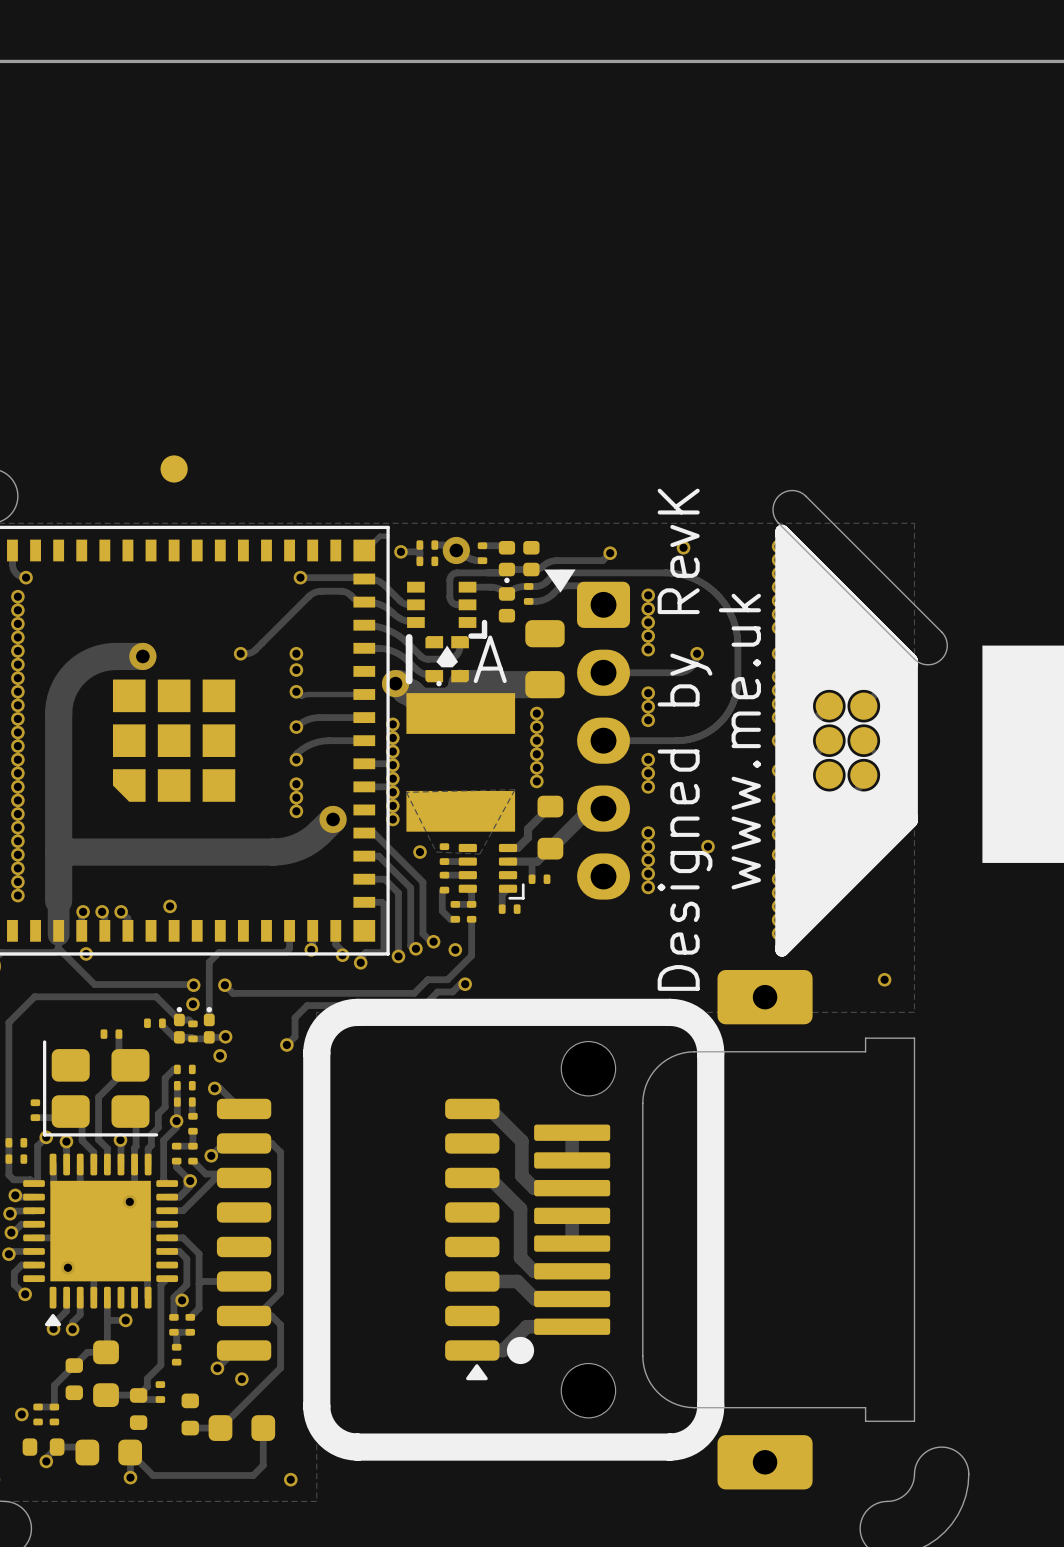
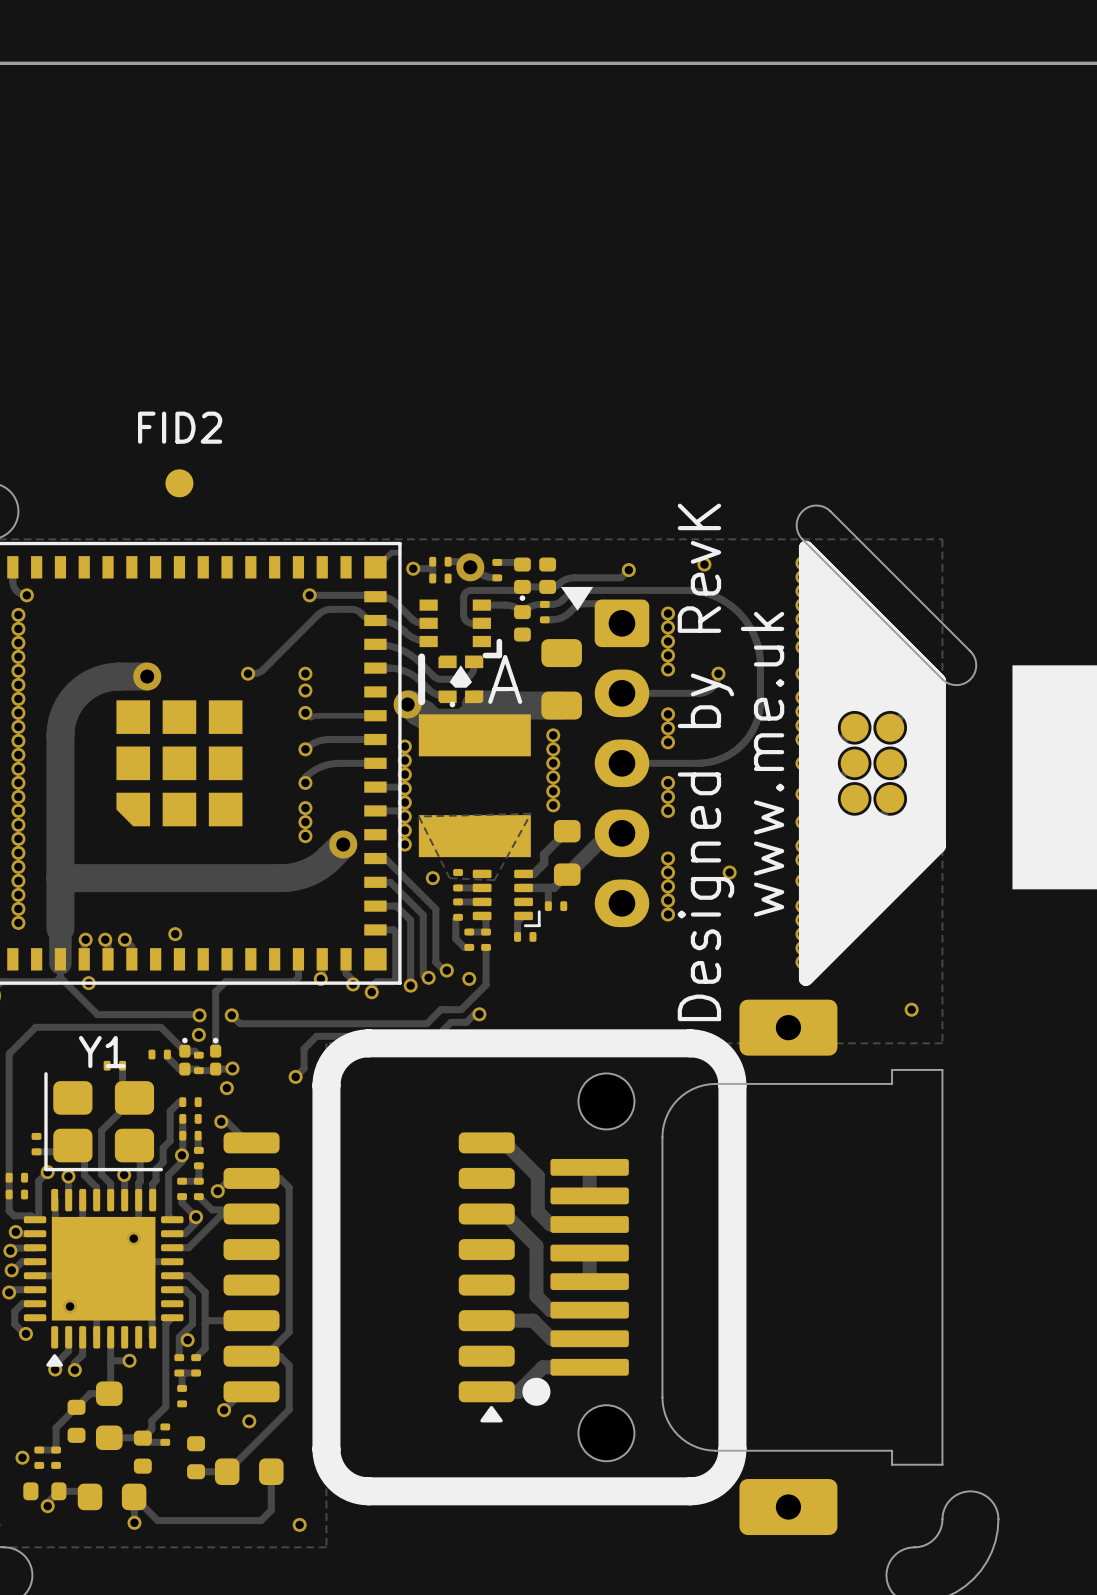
FID2 name: none -> FID2 (180, 427)
Y1 name: none -> Y1 (102, 1052)

